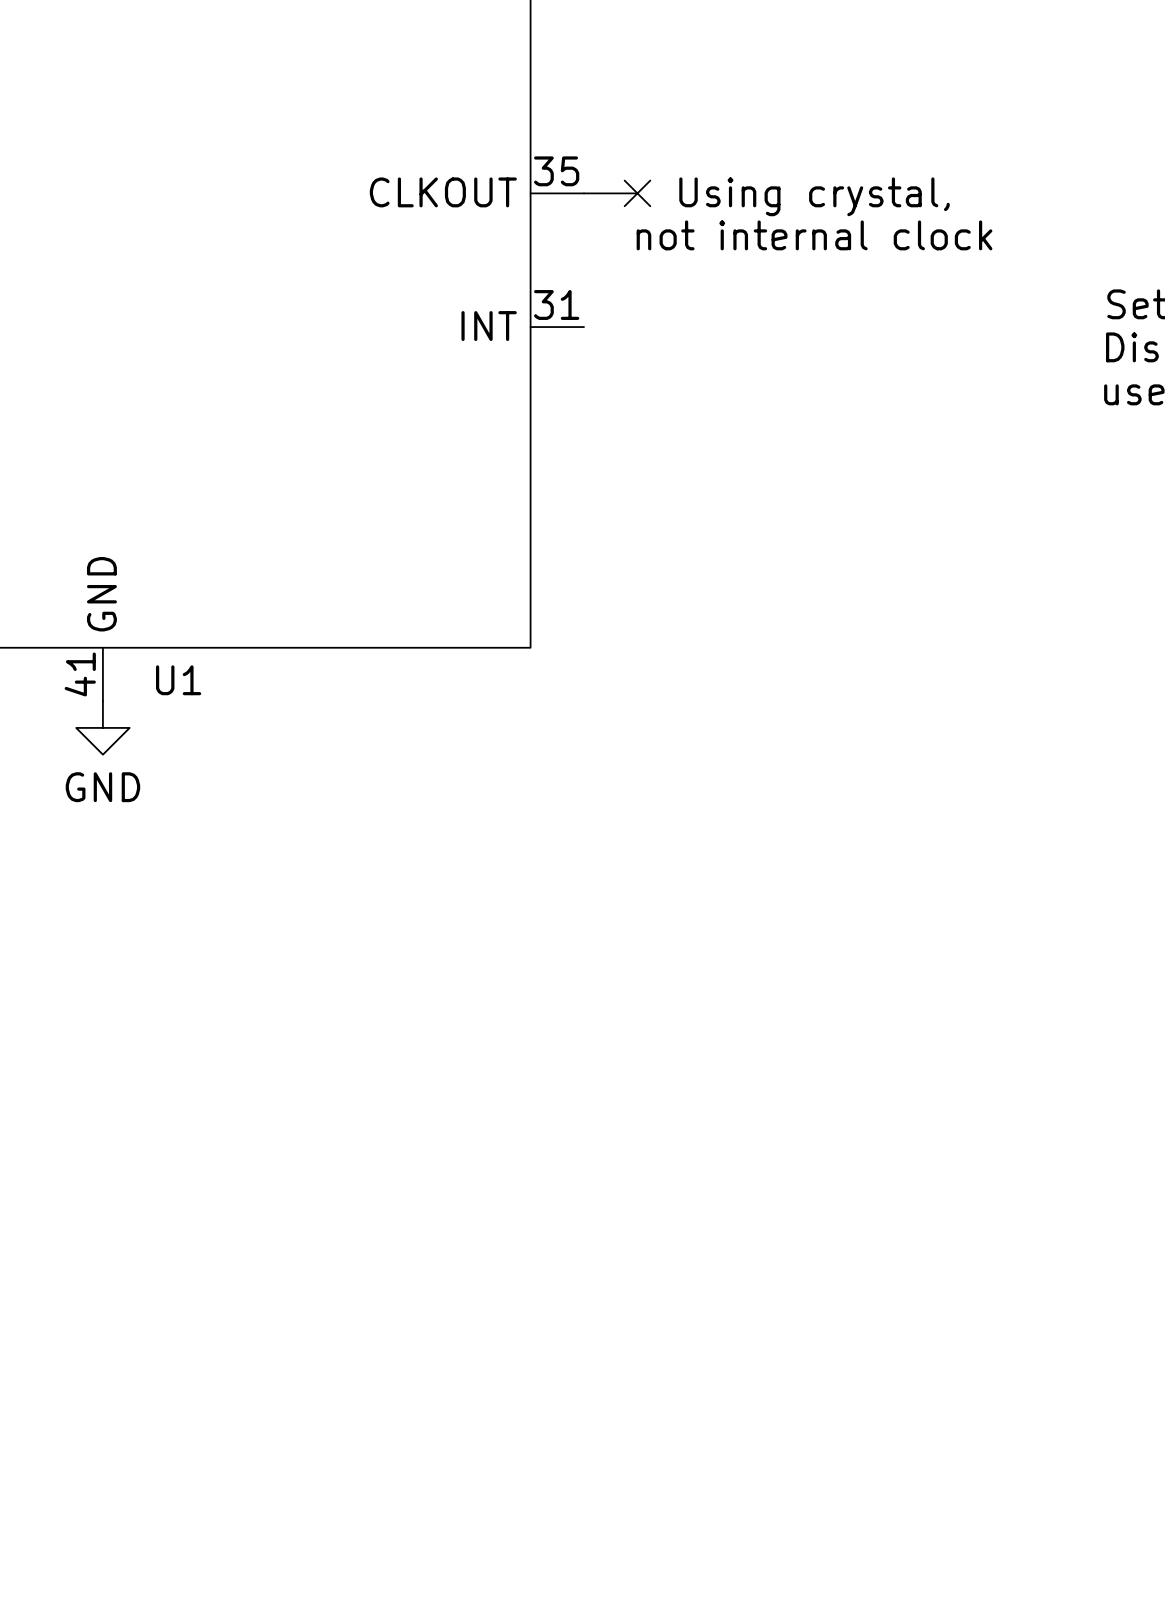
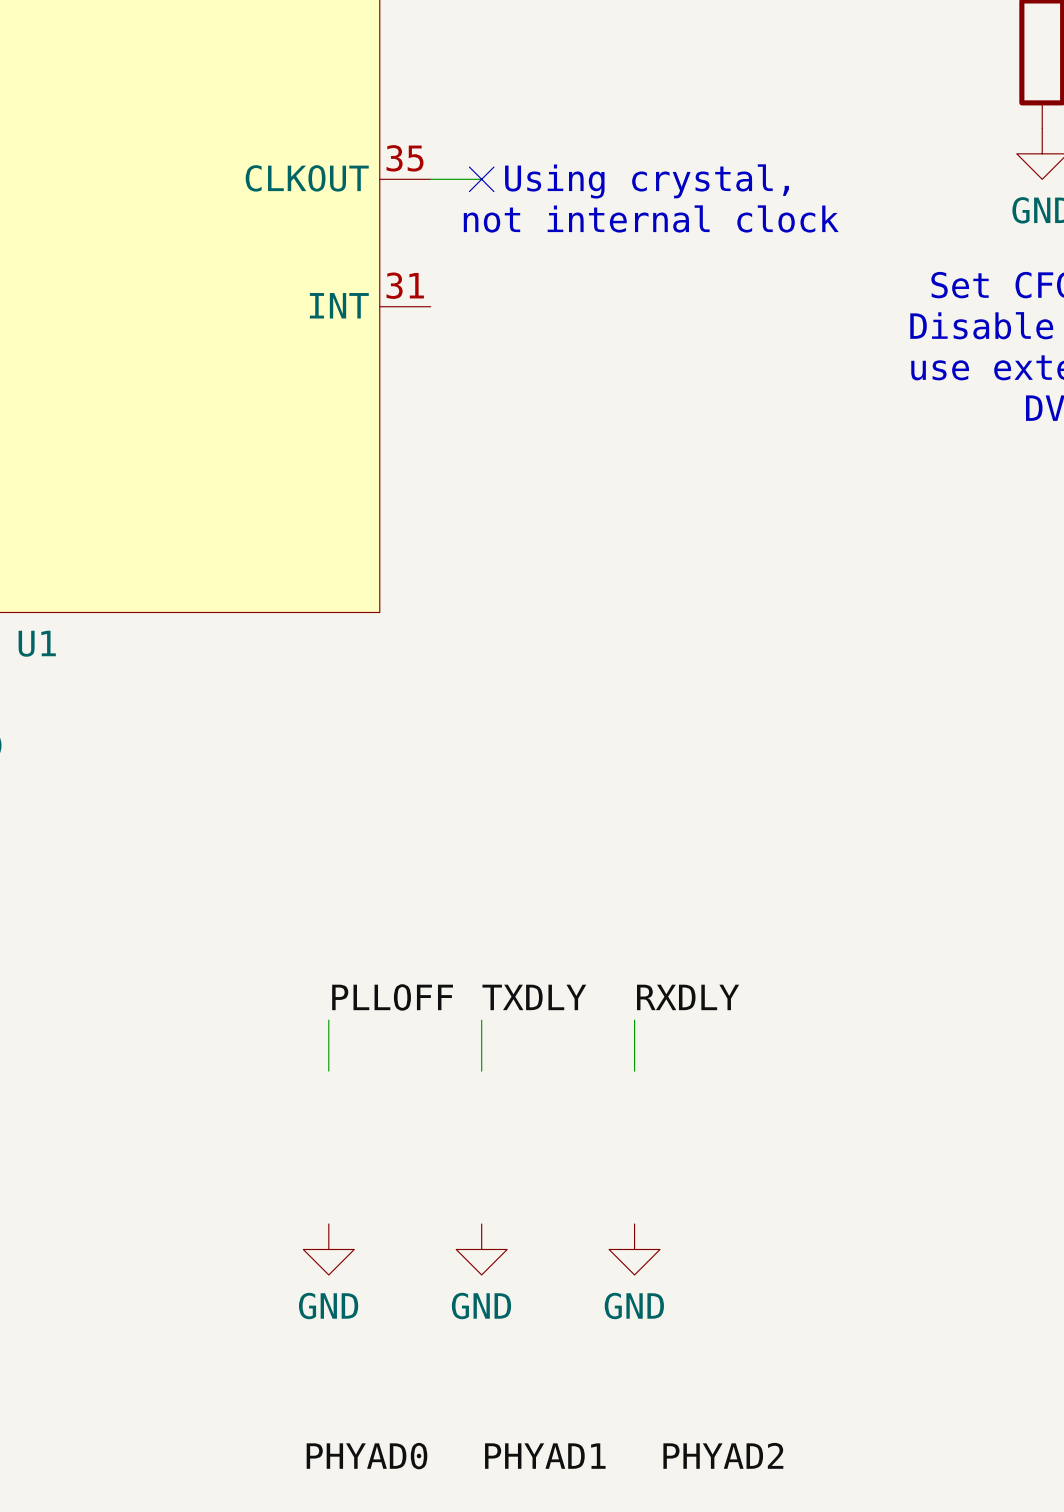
label: none -> PLLOFF (392, 997)
label: none -> TXDLY (534, 997)
label: none -> RXDLY (688, 997)
wire: none -> (328, 1020) (328, 1071)
wire: none -> (481, 1020) (481, 1071)
wire: none -> (634, 1020) (634, 1071)
power symbol: none -> GND (328, 1249)
power symbol: none -> GND (481, 1249)
power symbol: none -> GND (634, 1249)
label: none -> PHYAD0 (366, 1456)
label: none -> PHYAD1 (545, 1456)
label: none -> PHYAD2 (723, 1455)

